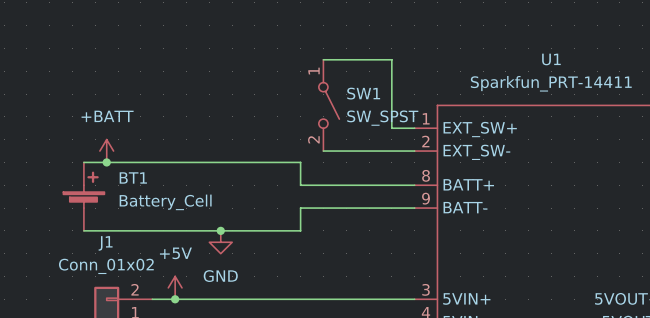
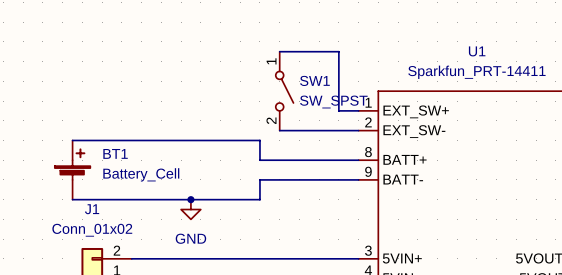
power symbol: +BATT (106, 151) -> none
junction: (106, 162) -> none
power symbol: +5V (175, 287) -> none
junction: (175, 299) -> none

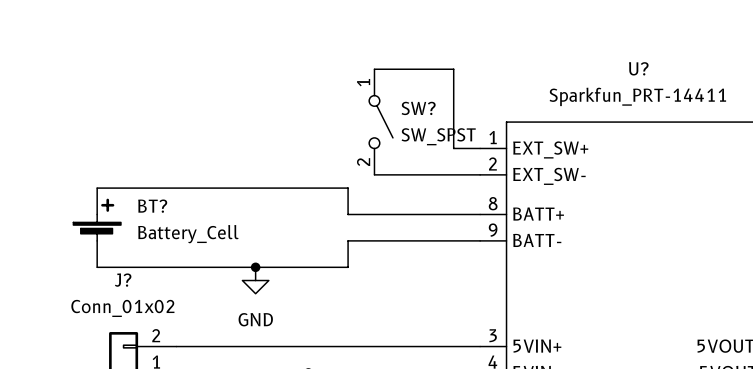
U1 name: U1 (477, 51) -> U? (638, 68)
SW1 name: SW1 (314, 80) -> SW? (418, 108)
BT1 name: BT1 (115, 153) -> BT? (152, 206)
J1 name: J1 (92, 209) -> J? (123, 280)

